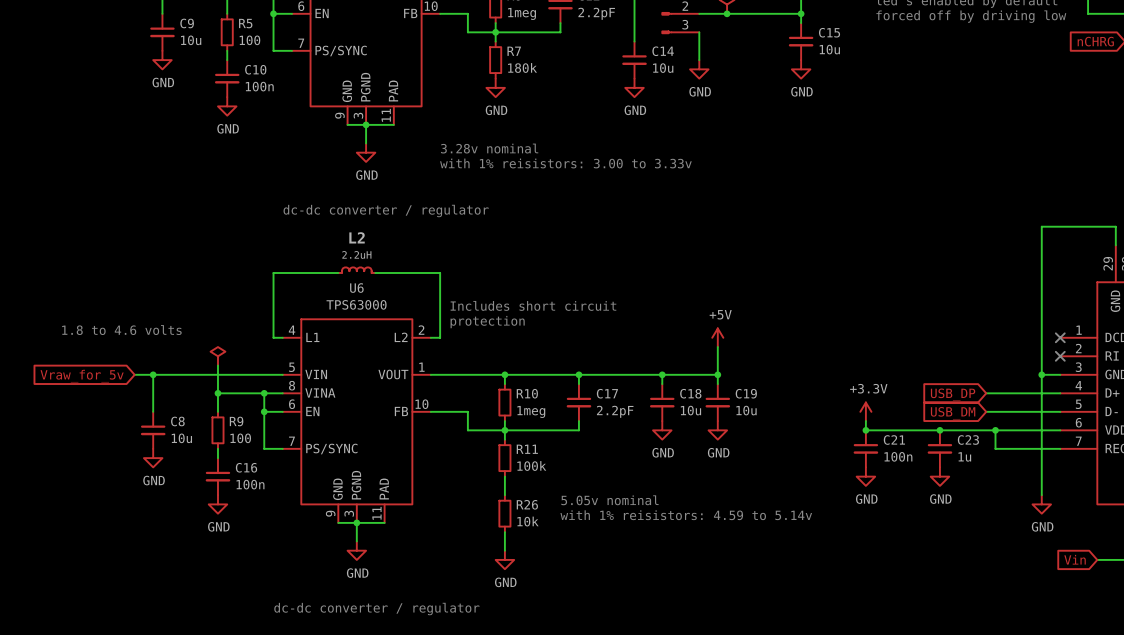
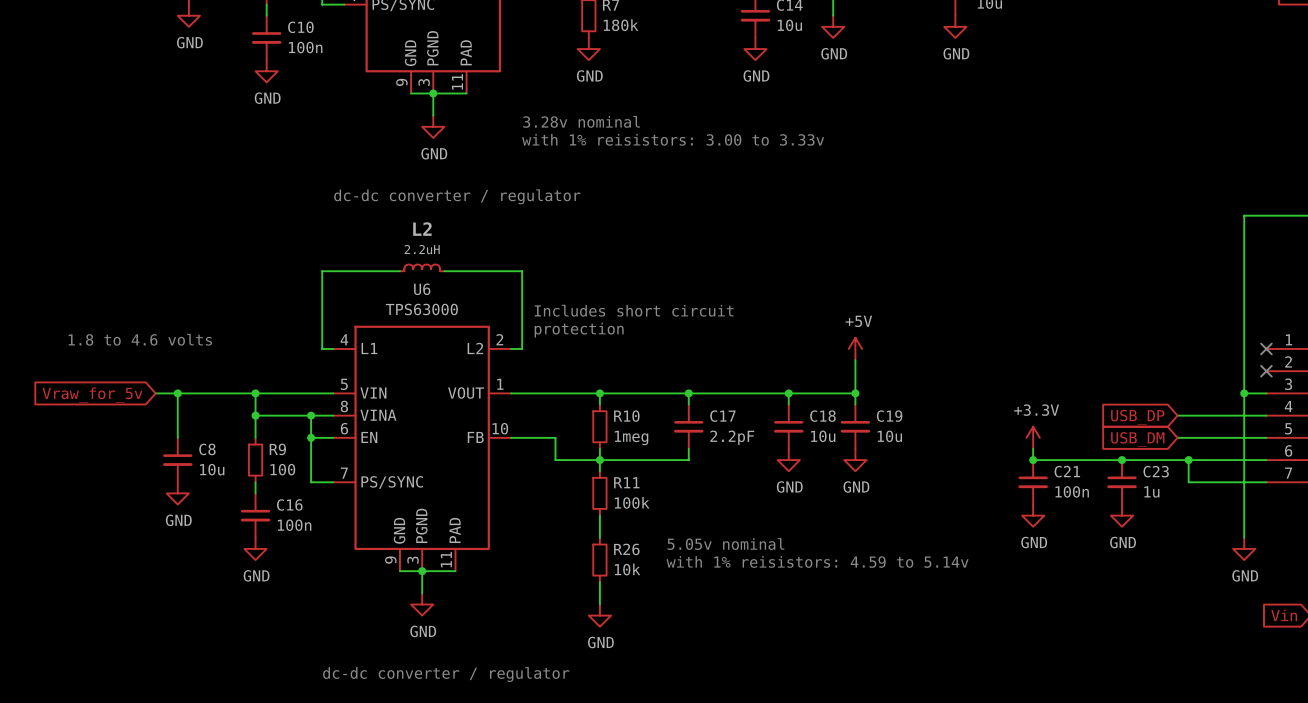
power symbol: (217, 356) -> none
wire: (217, 365) (217, 374) -> none
junction: none -> (255, 393)

